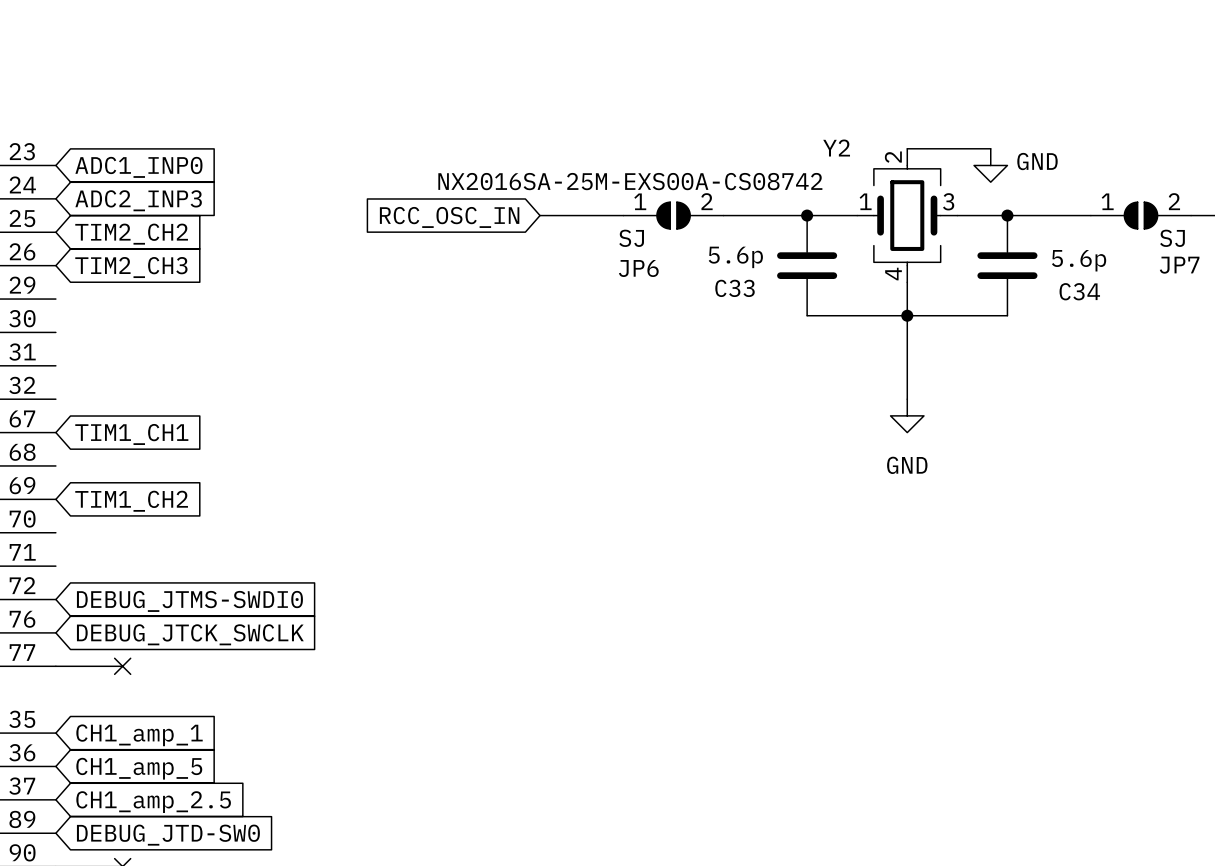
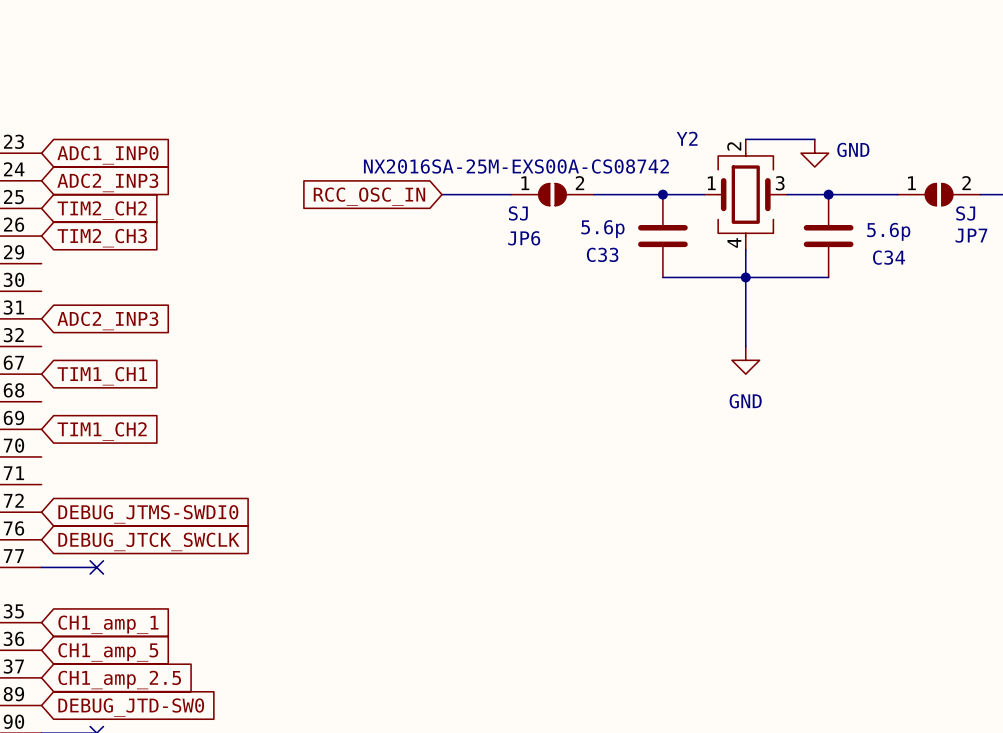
global label: none -> ADC2_INP3 (107, 321)

